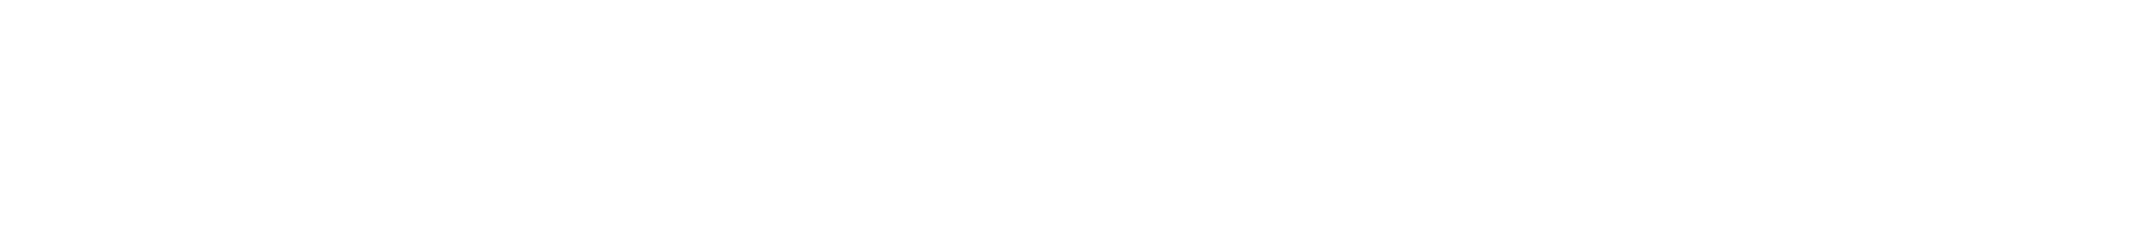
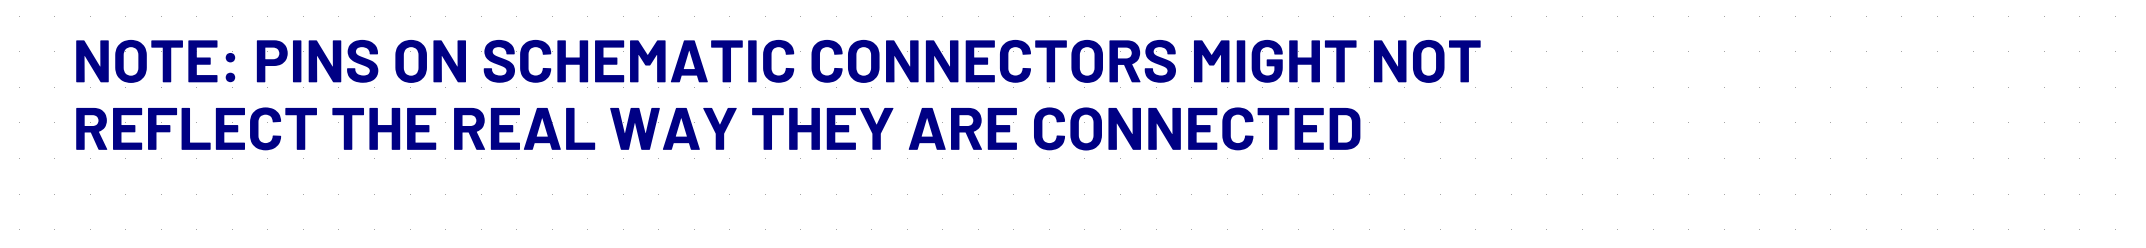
text: none -> NOTE: PINS ON SCHEMATIC CONNECTORS MIGHT NOT (778, 61)
text: none -> REFLECT THE REAL WAY THEY ARE CONNECTED (718, 128)

